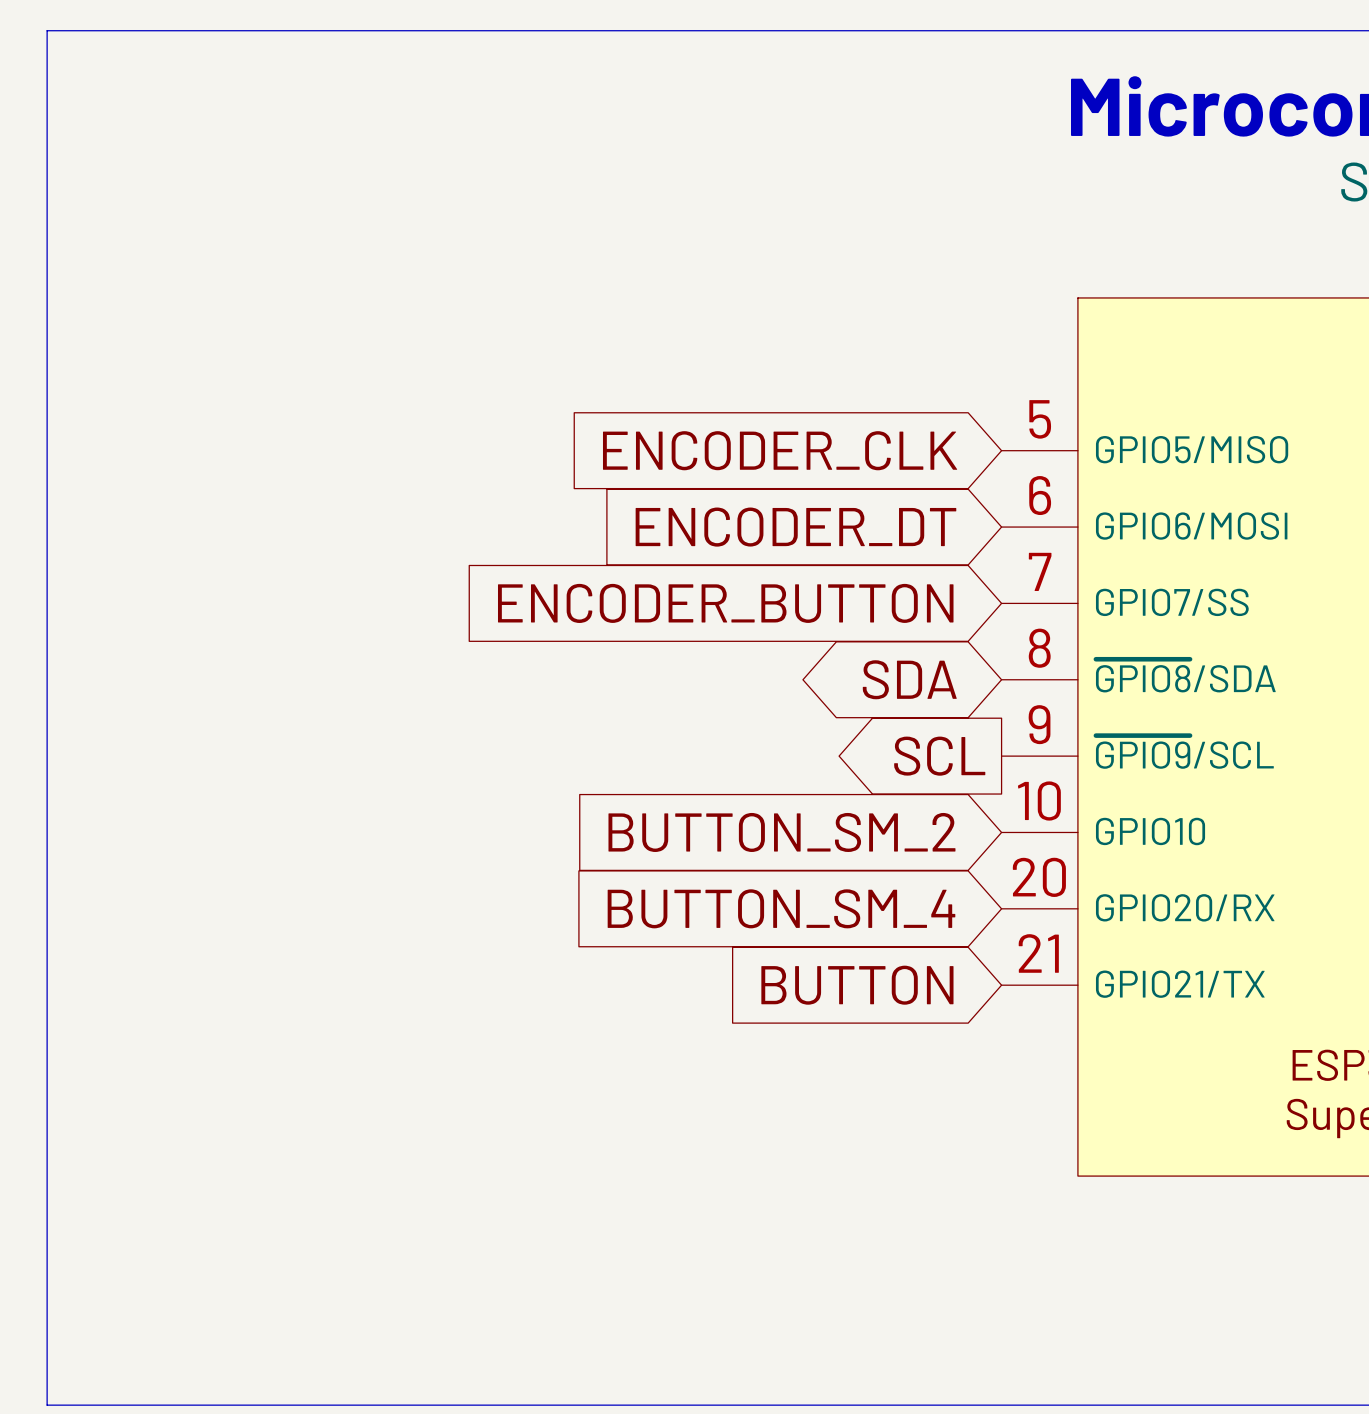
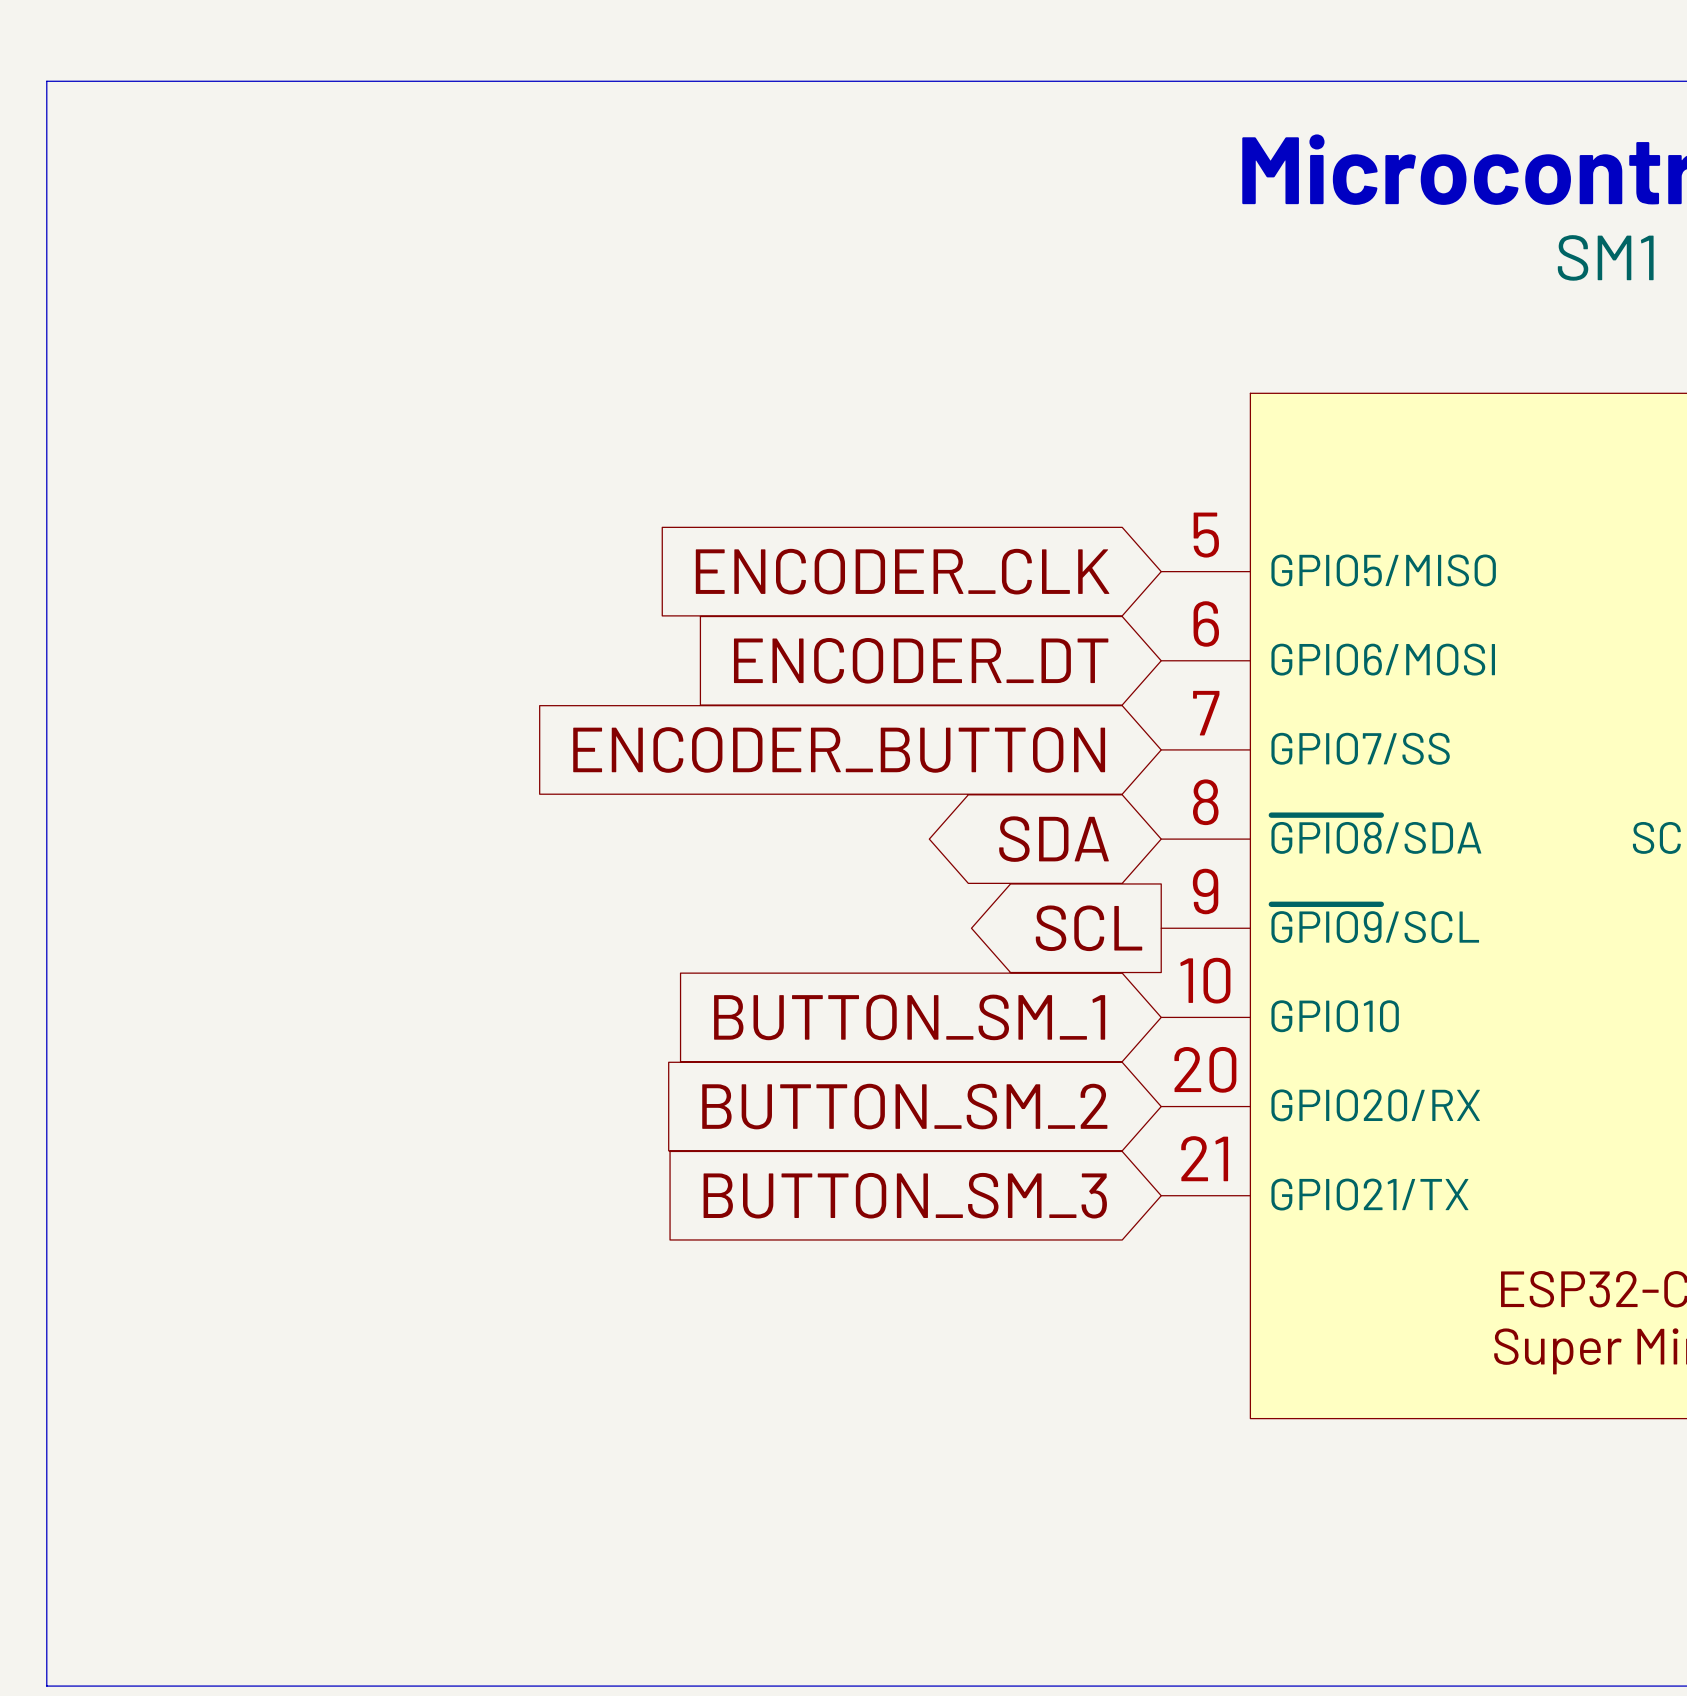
global label: BUTTON_SM_2 (781, 832) -> BUTTON_SM_1 (909, 1017)
global label: BUTTON_SM_4 (781, 908) -> BUTTON_SM_2 (904, 1106)
global label: BUTTON (857, 985) -> BUTTON_SM_3 (905, 1195)

